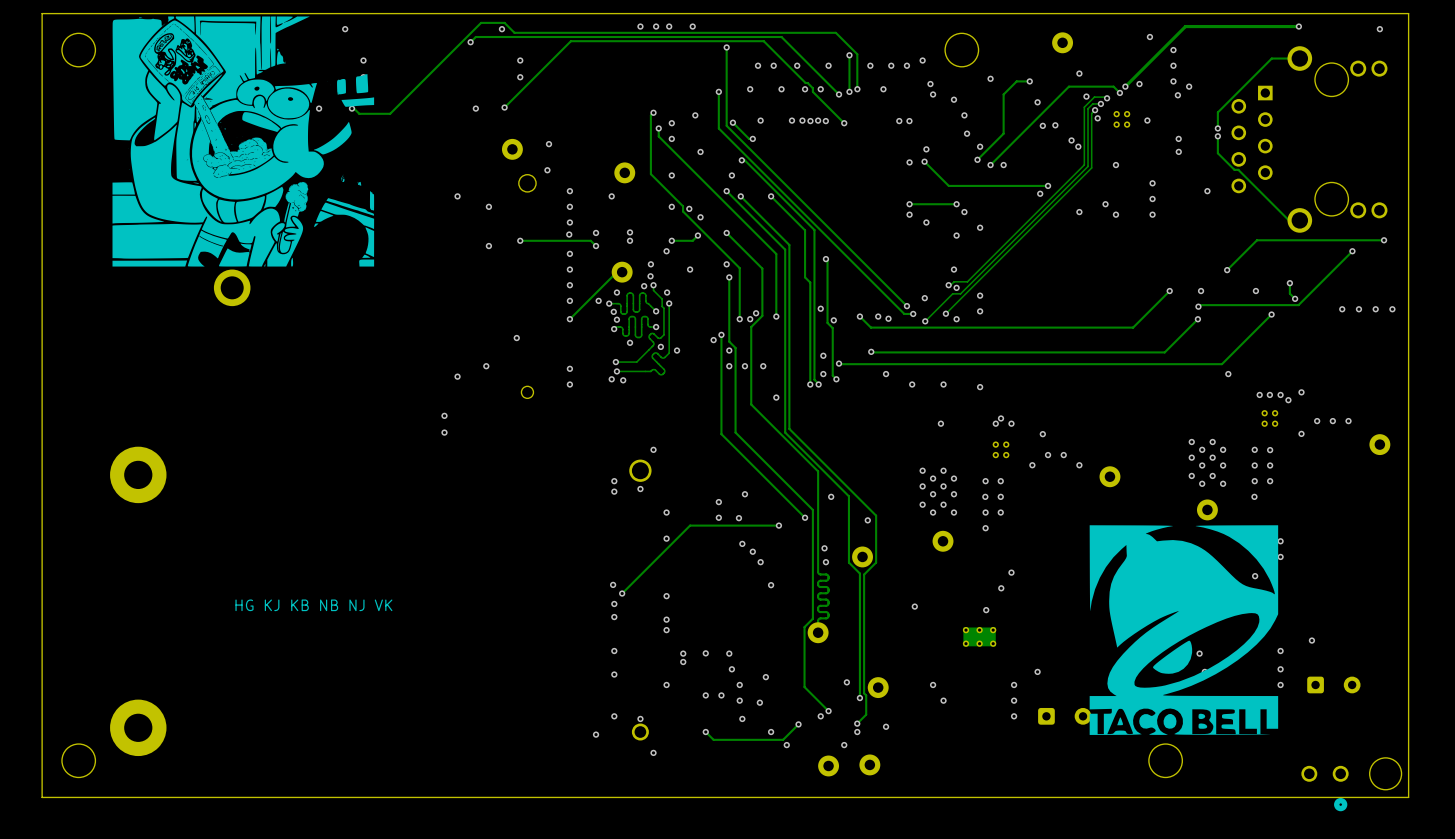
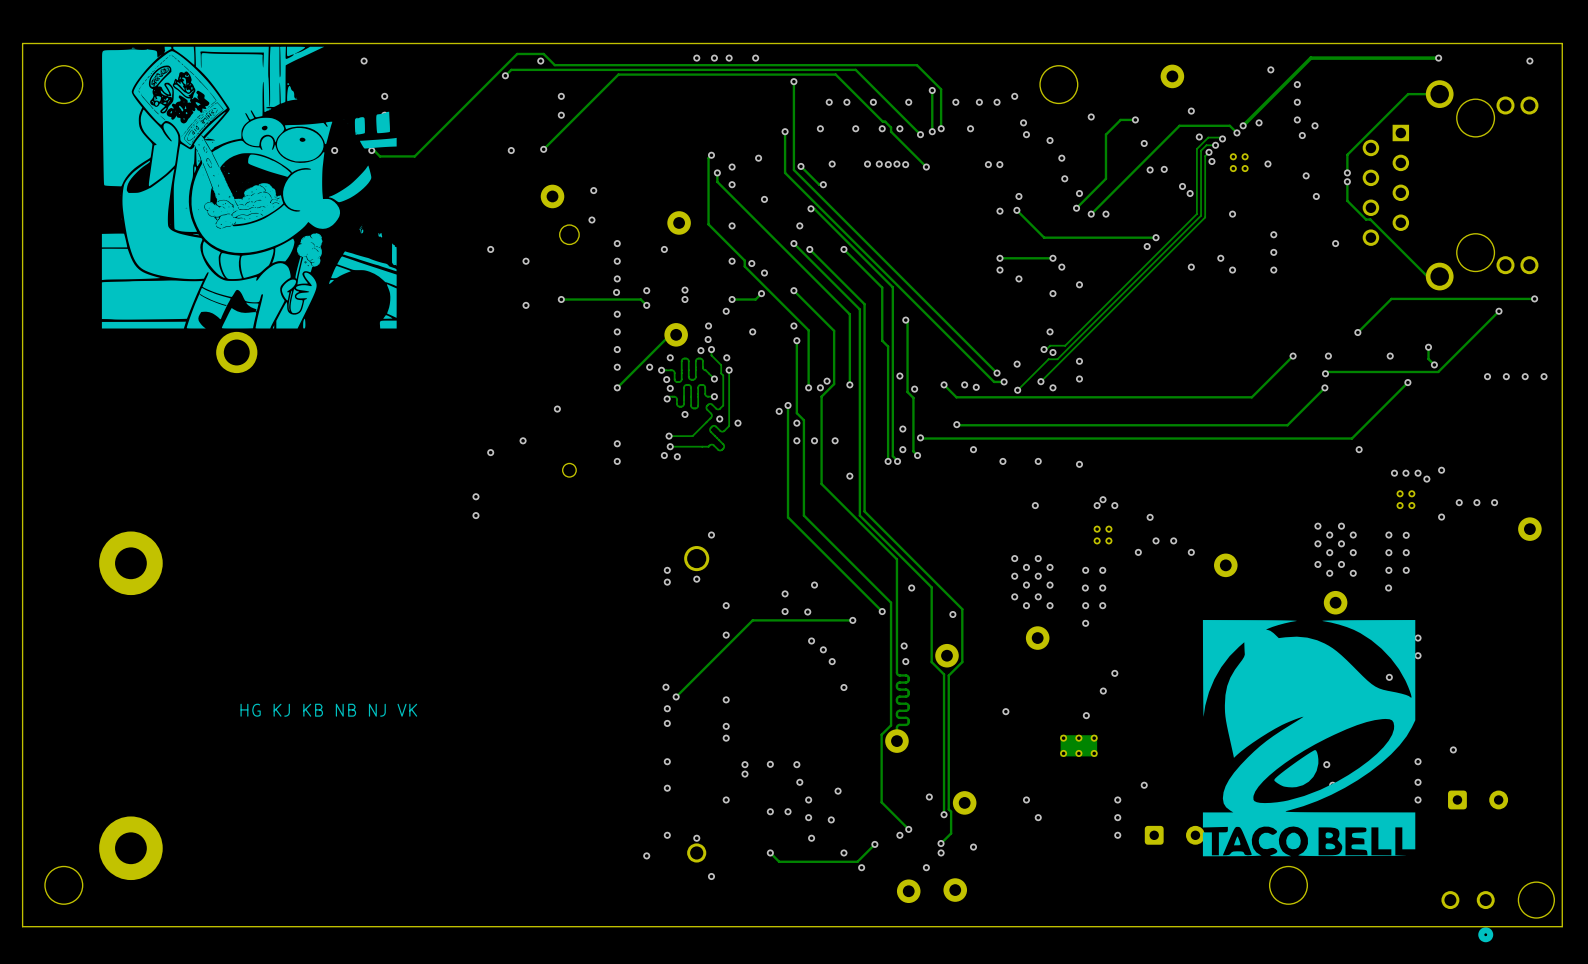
via: none -> (1306, 175)
via: (1178, 138) -> none
via: none -> (1316, 196)
via: (1178, 151) -> none

